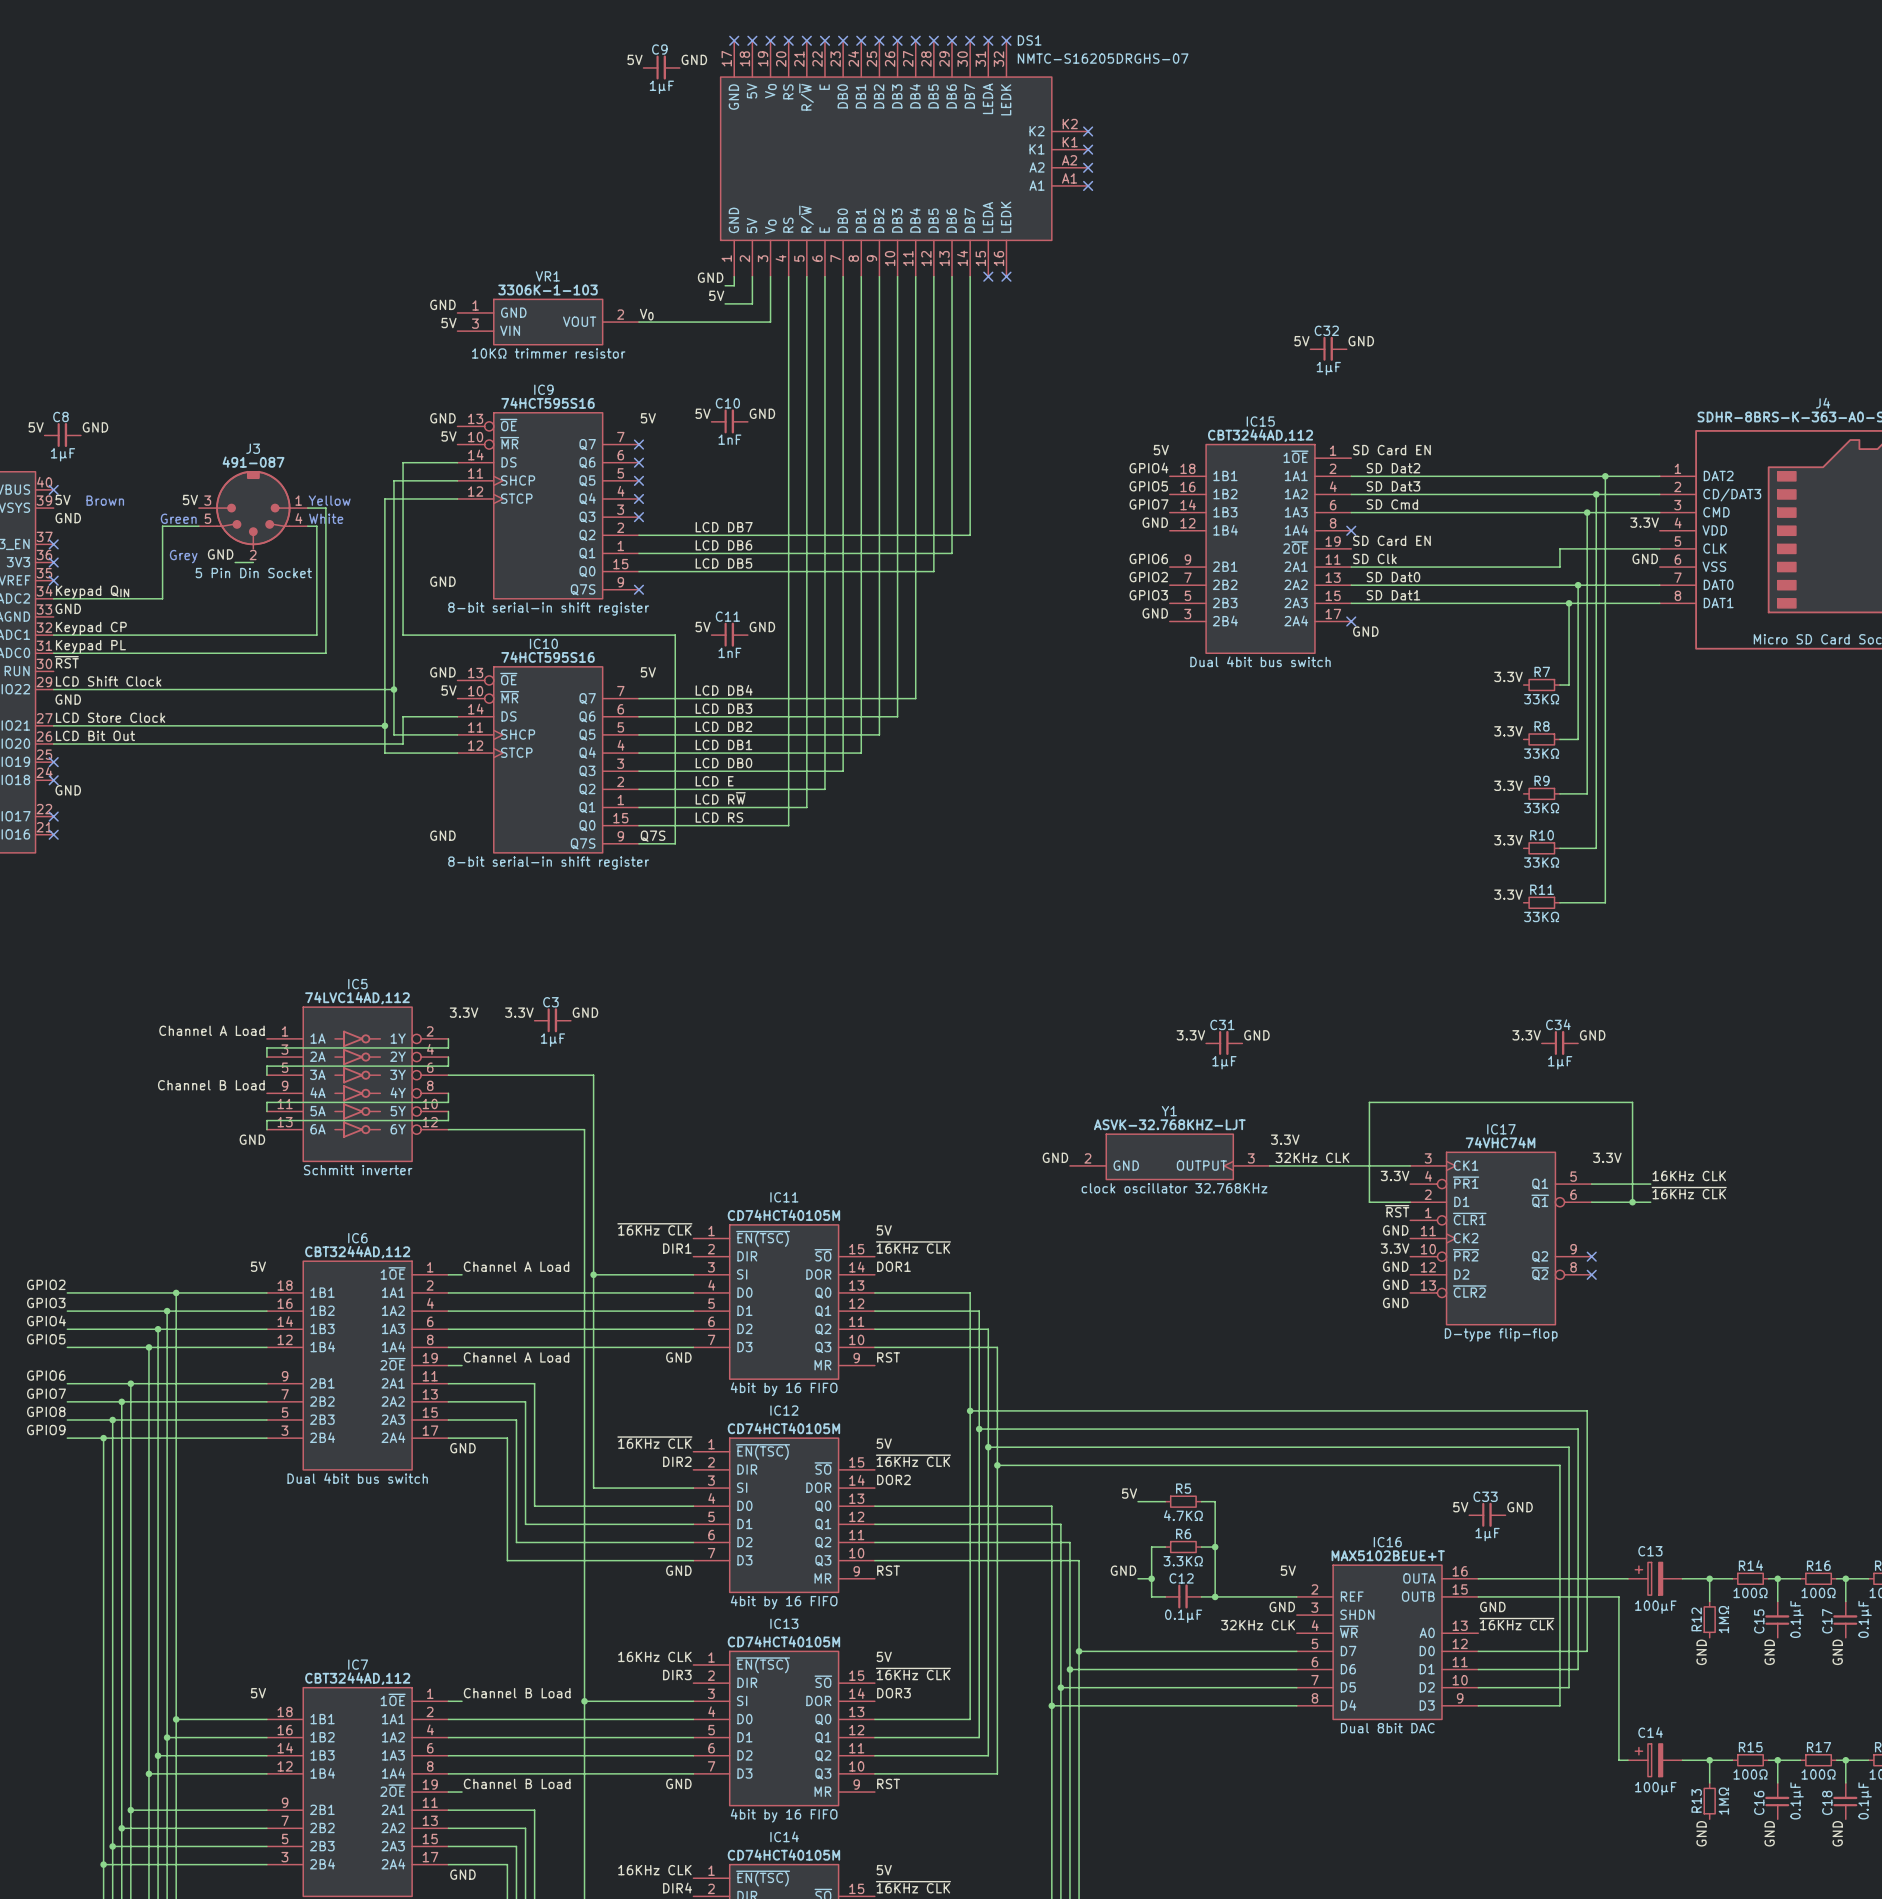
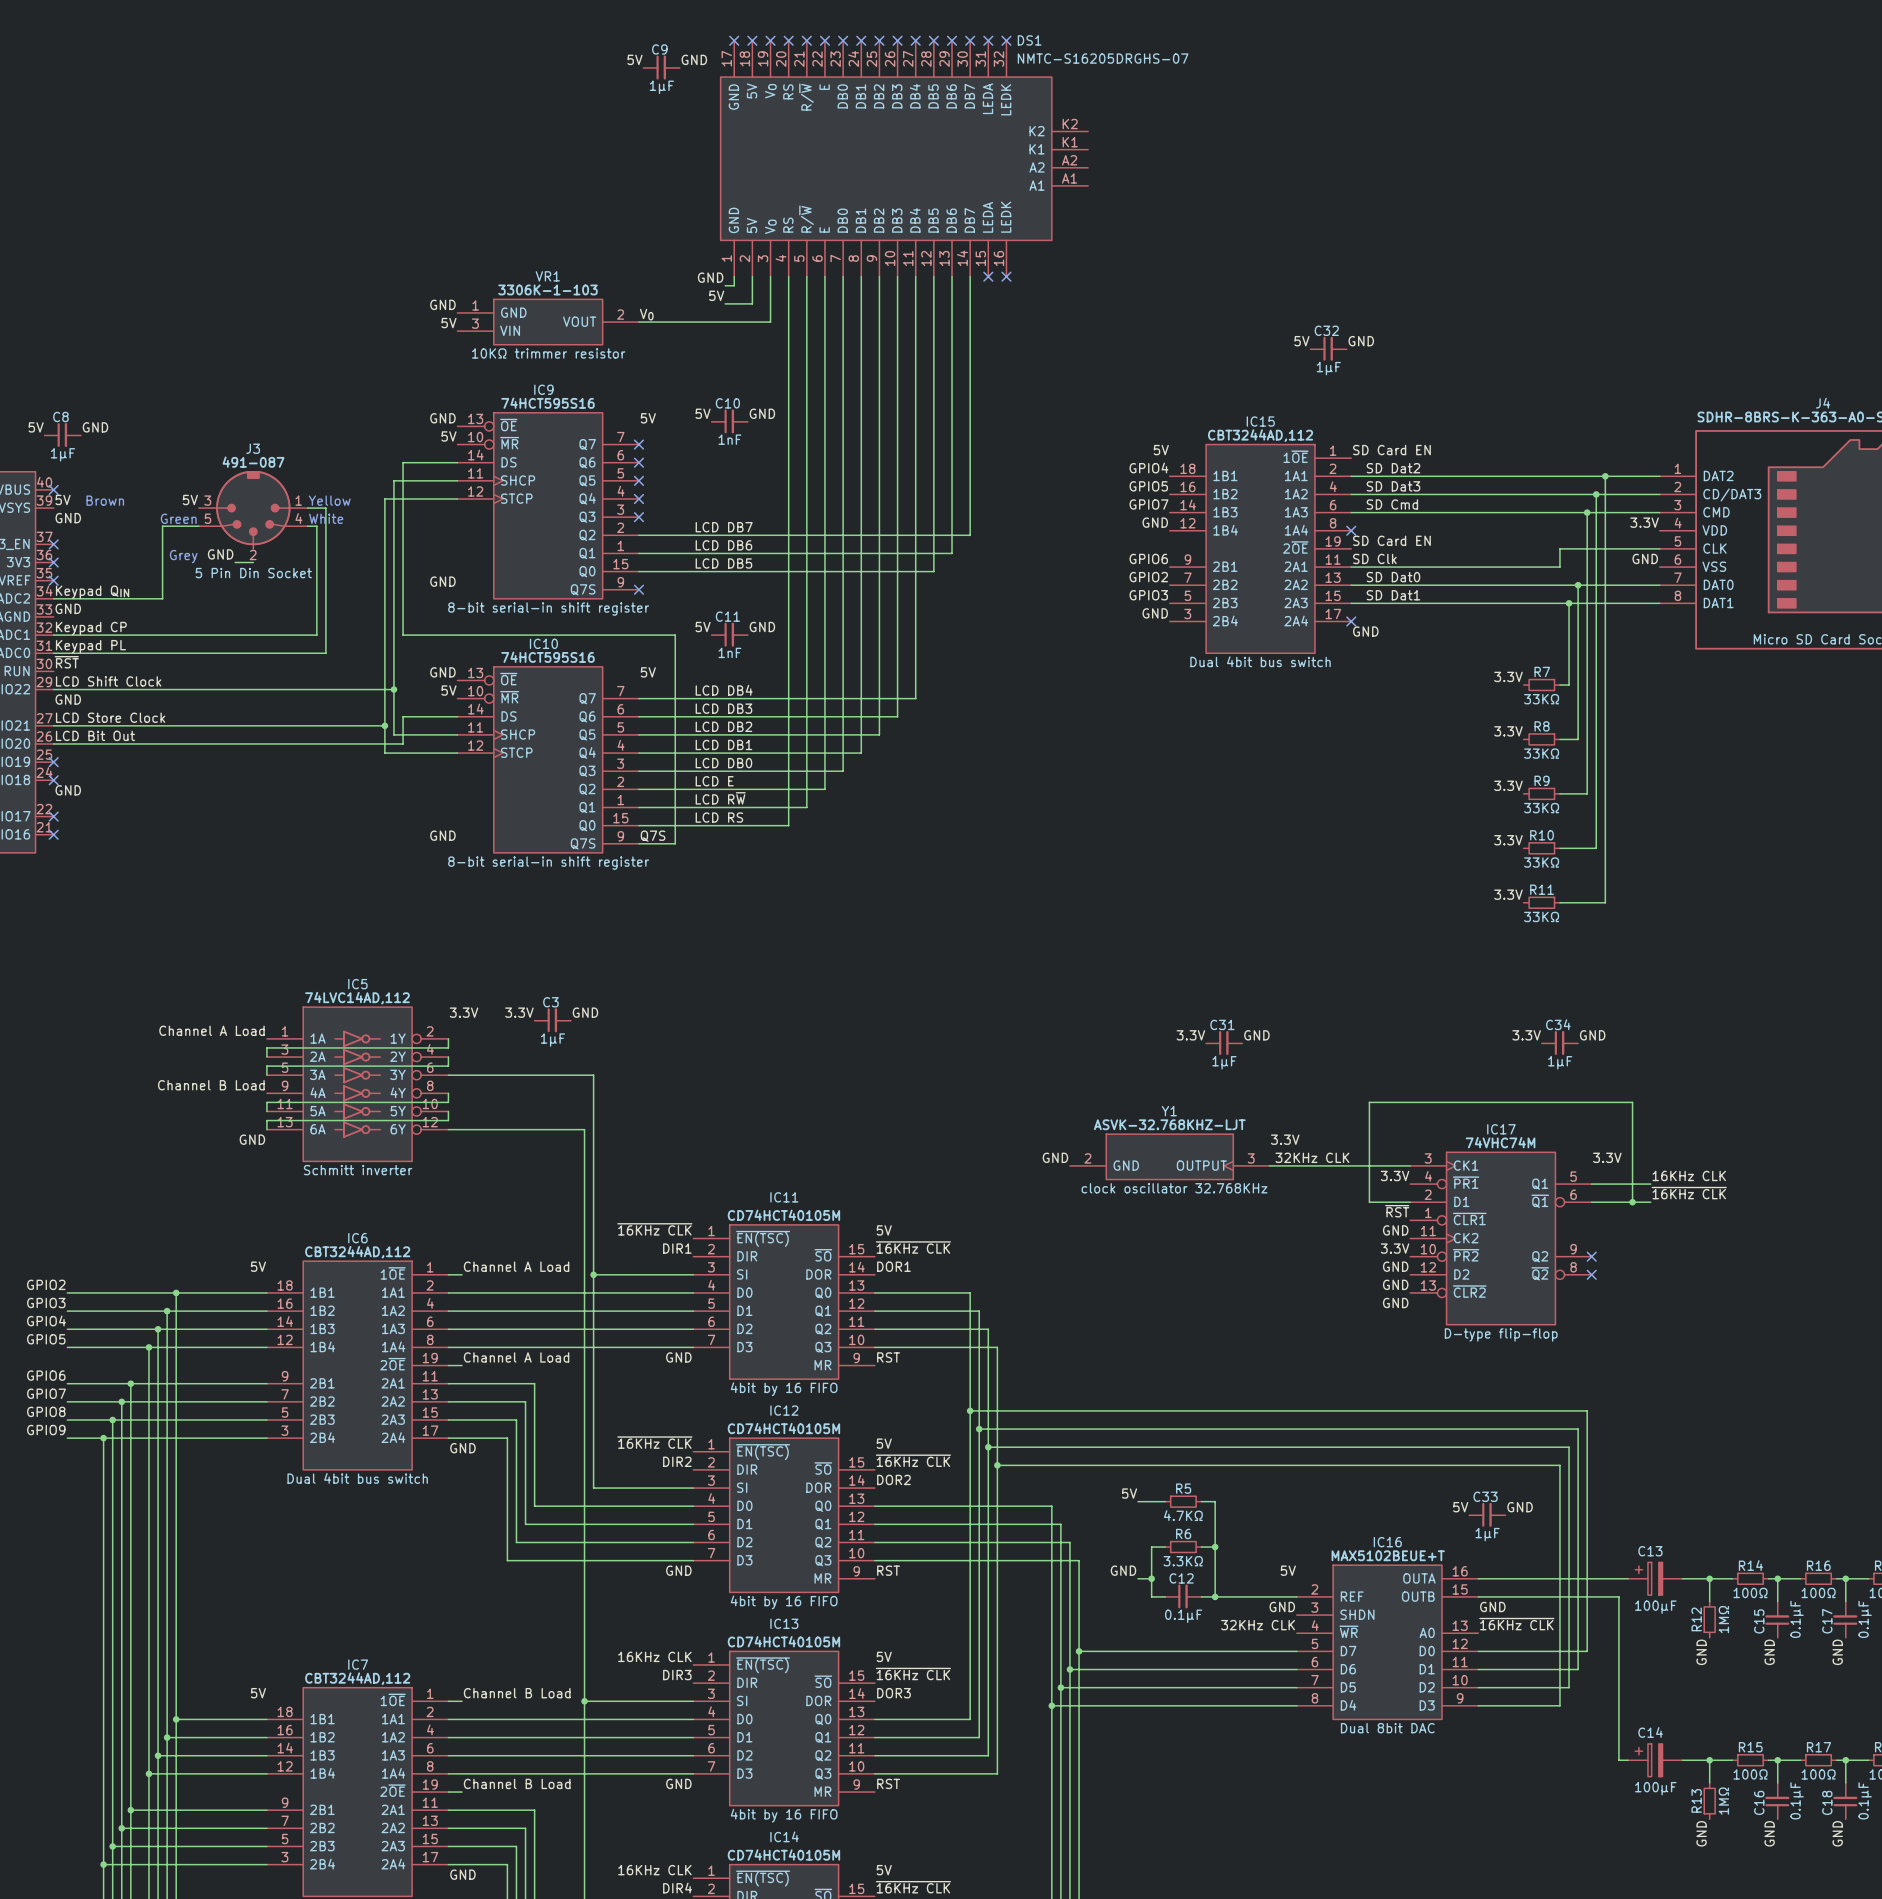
no-connect mark: (1088, 131) -> none
no-connect mark: (1088, 149) -> none
no-connect mark: (1088, 167) -> none
no-connect mark: (1088, 185) -> none

